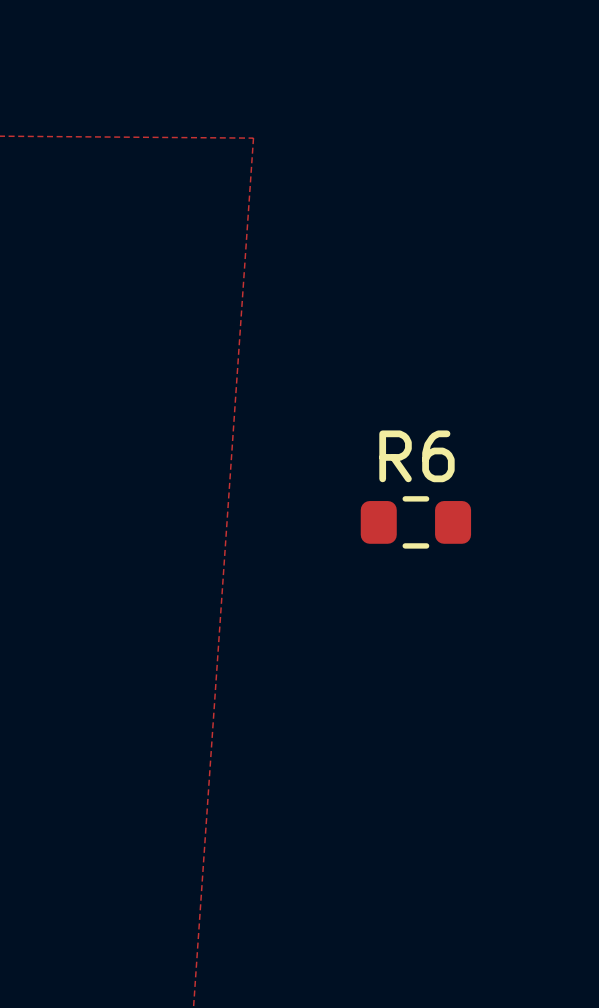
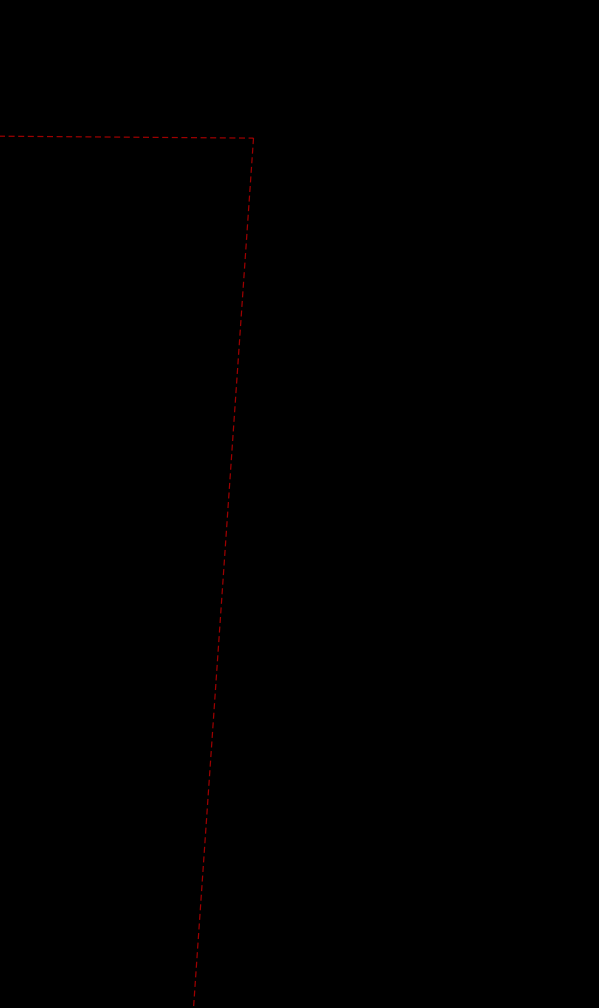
R6: (415, 522) -> none

